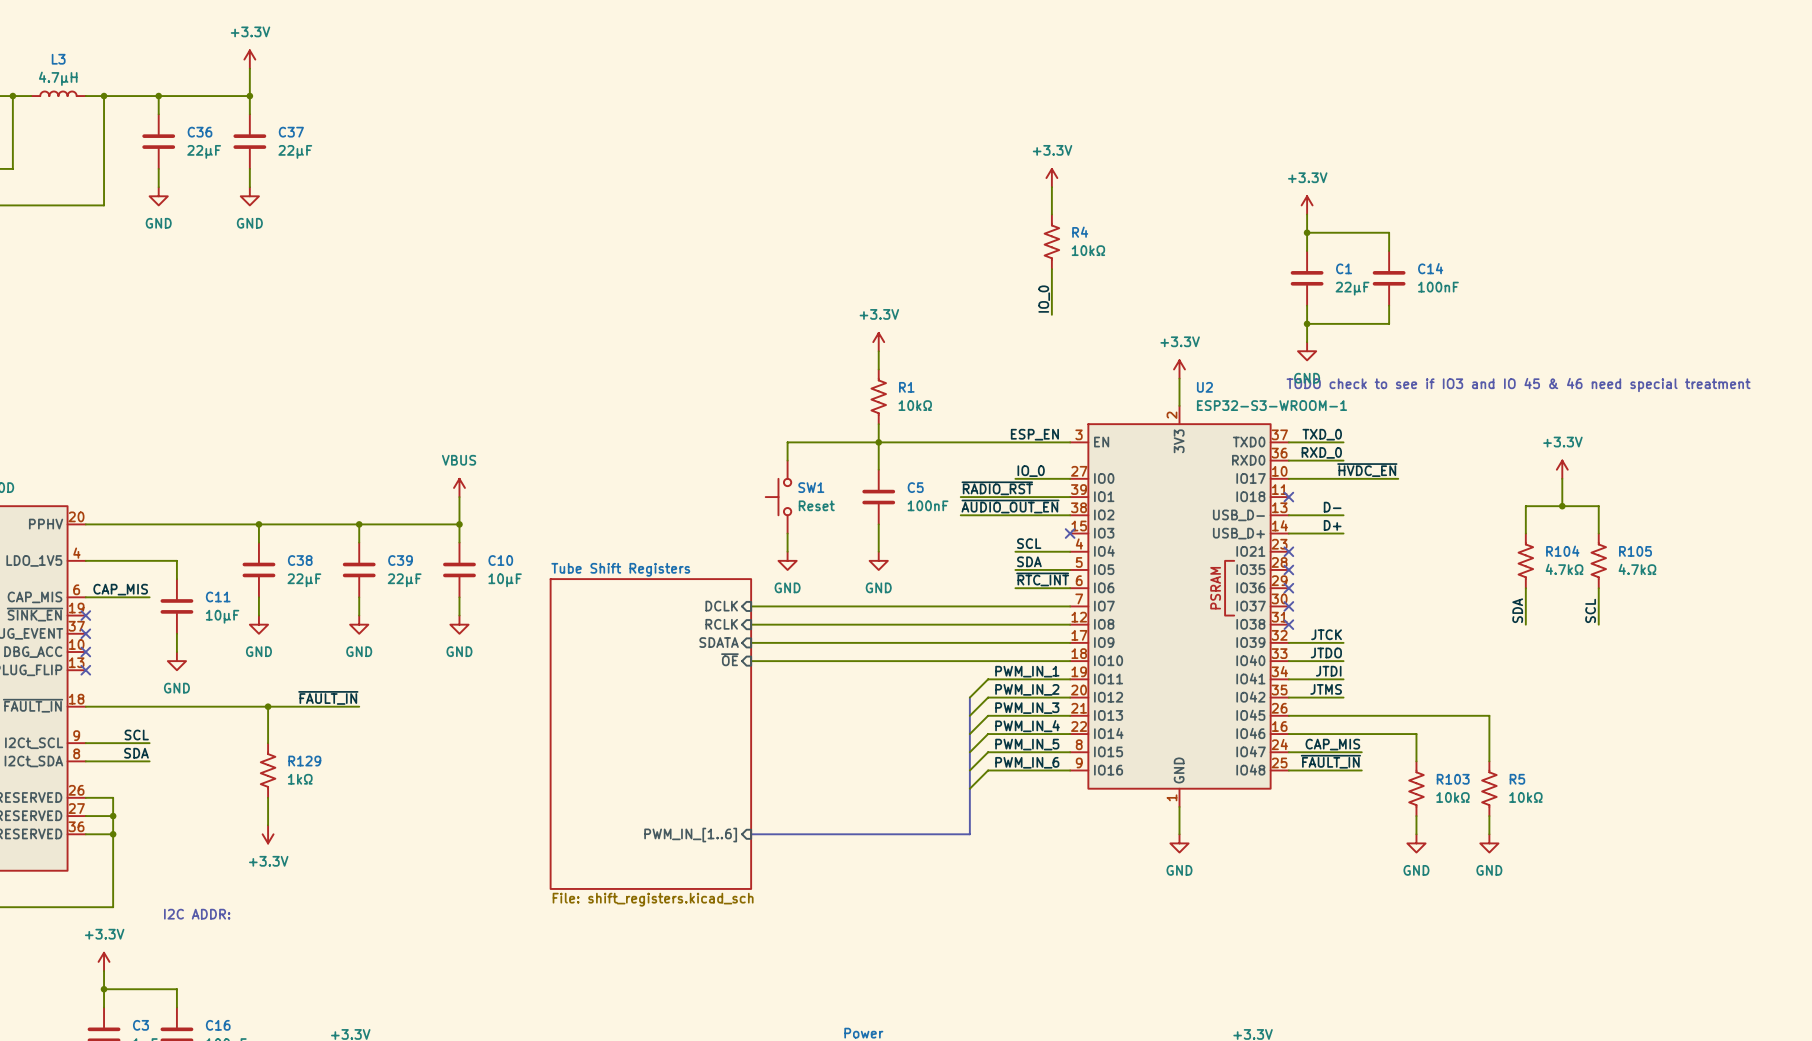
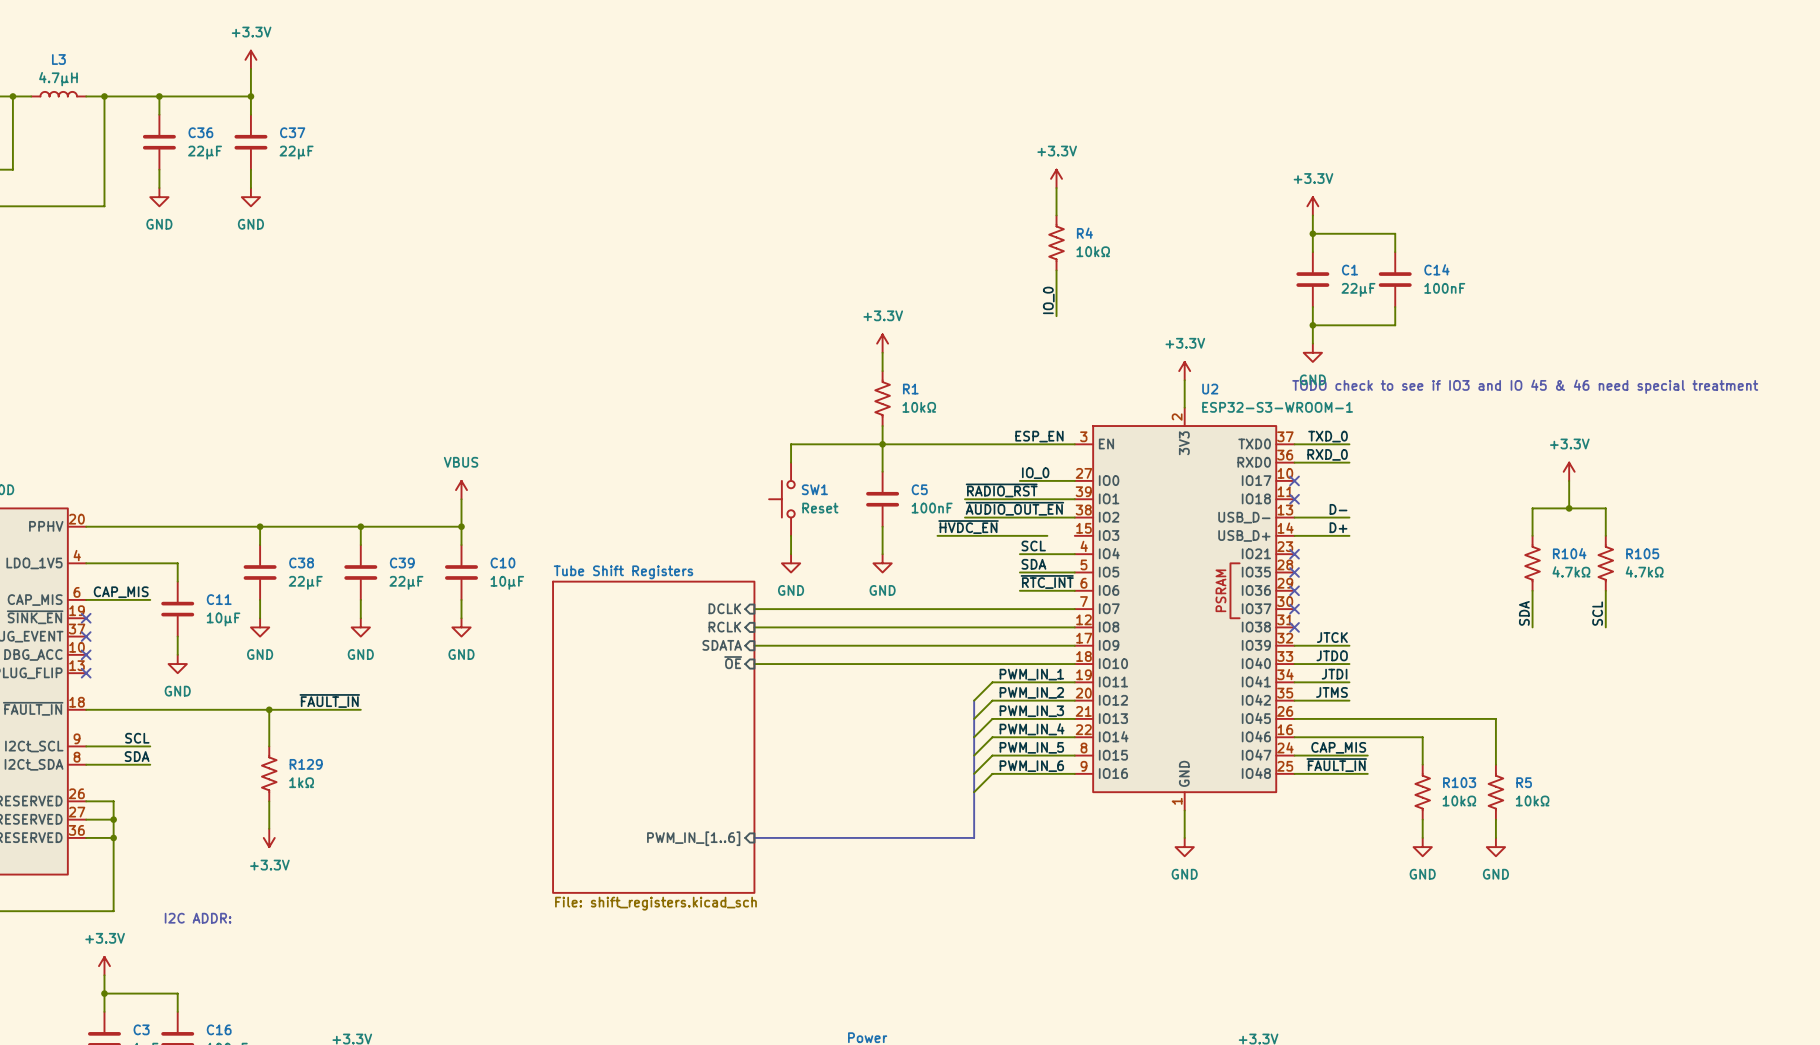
label: ~{HVDC_EN} (1367, 470) -> none
wire: (1288, 478) (1398, 478) -> none
no-connect mark: none -> (1294, 480)
label: none -> ~{HVDC_EN} (968, 527)
wire: none -> (937, 535) (1047, 535)
no-connect mark: (1070, 533) -> none

